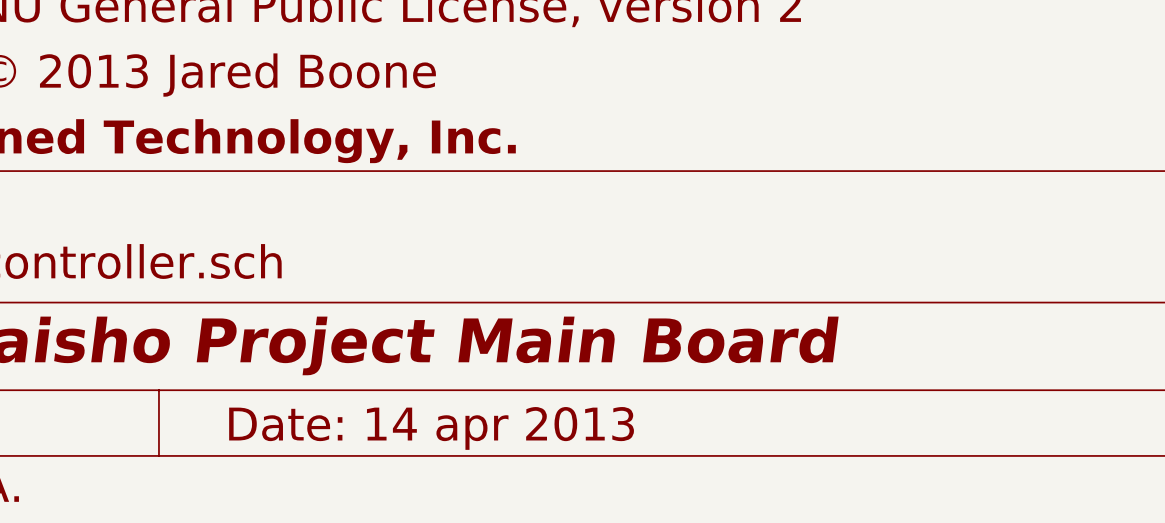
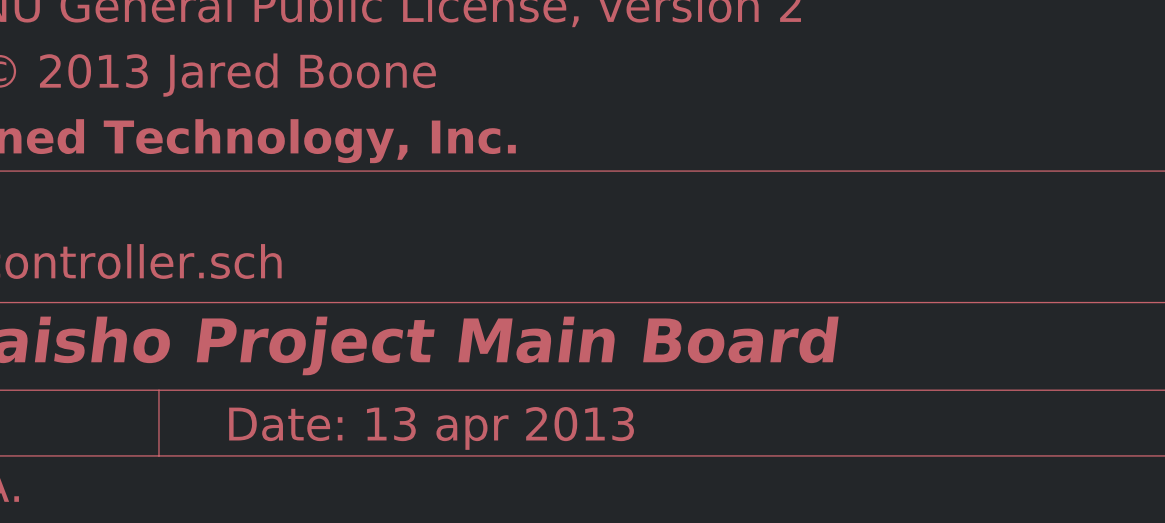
title block: Date: 14 apr 2013 (431, 428) -> Date: 13 apr 2013 (431, 428)

